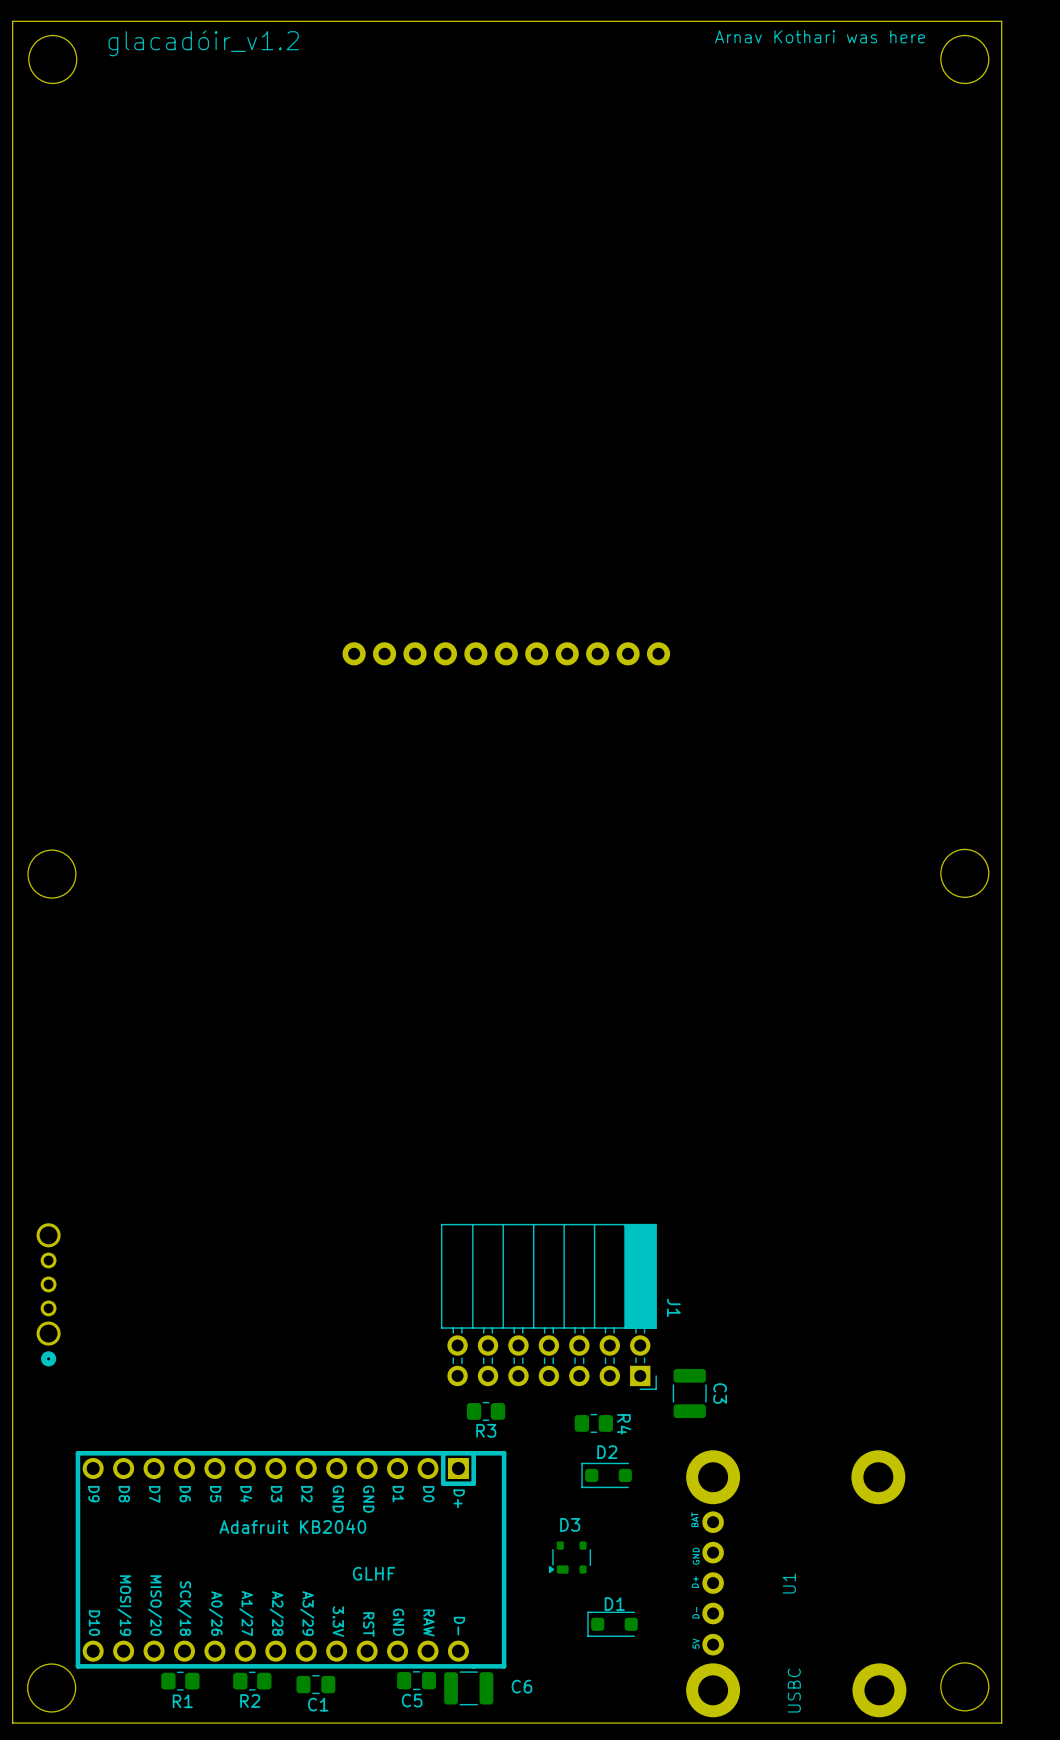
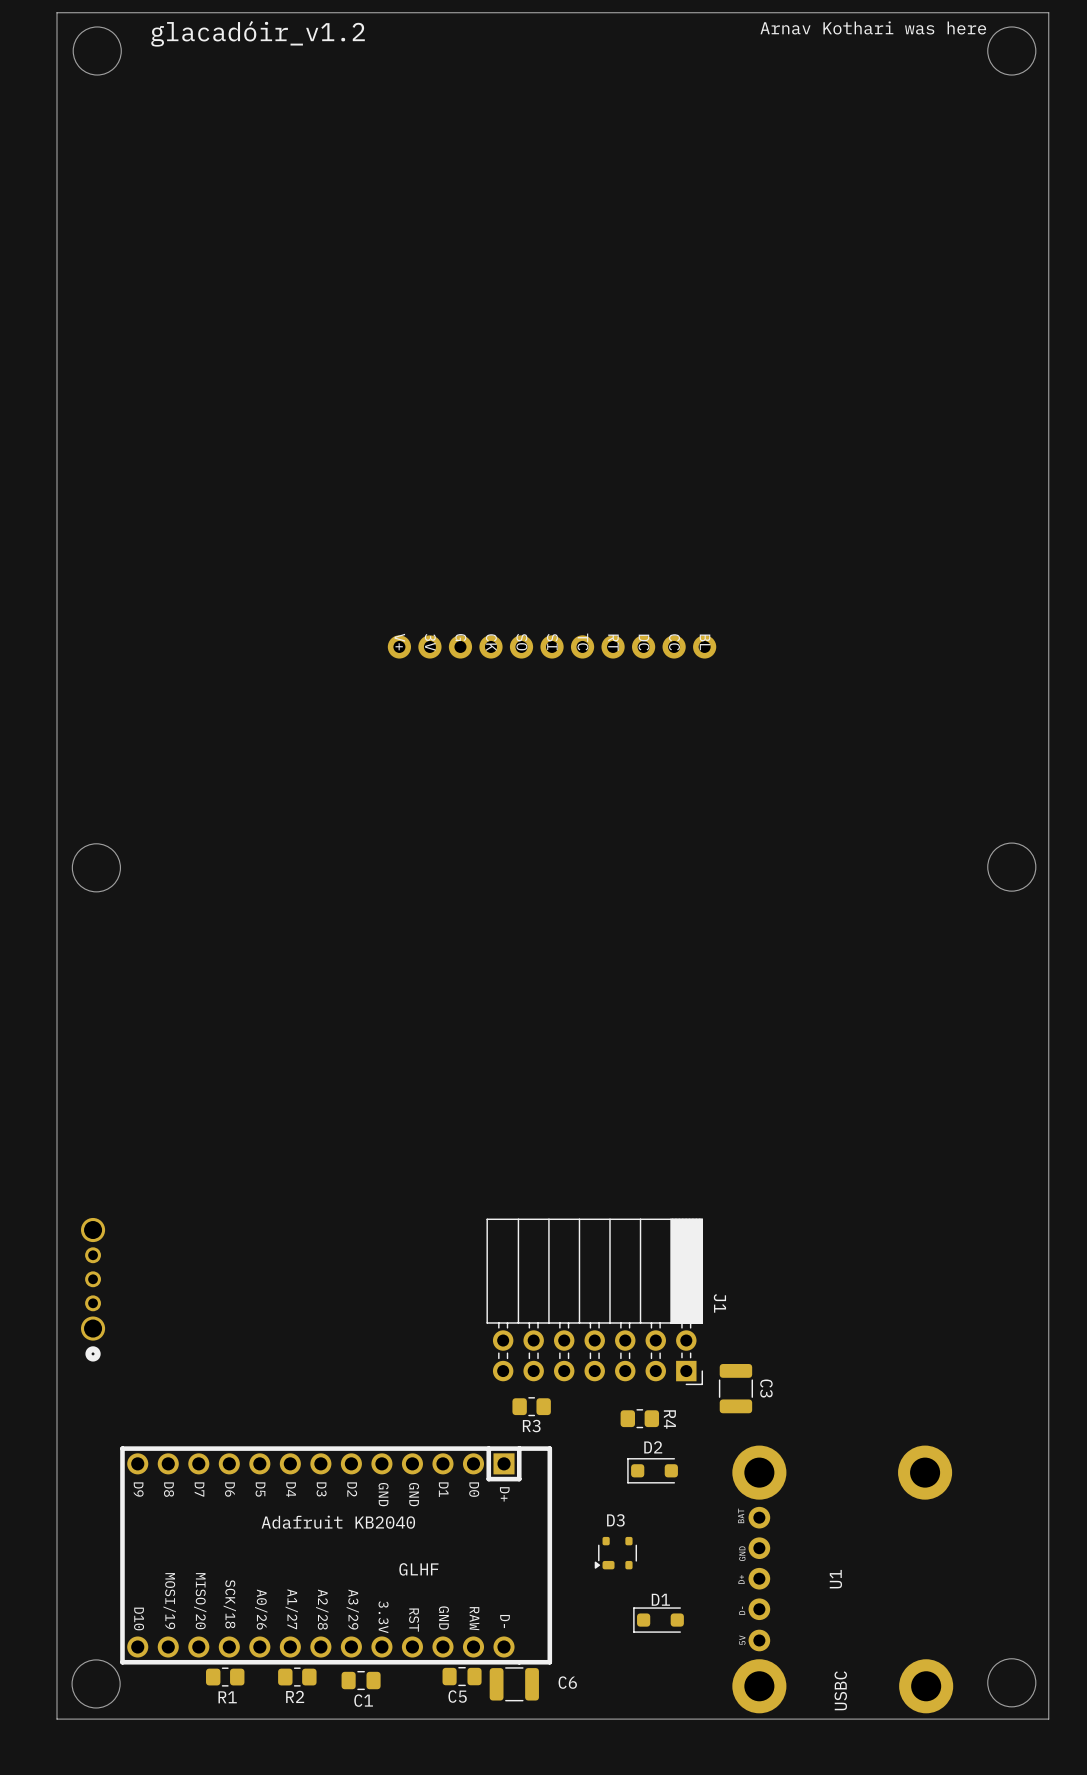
part footprint: [342, 642, 671, 666] -> [387, 635, 717, 659]

